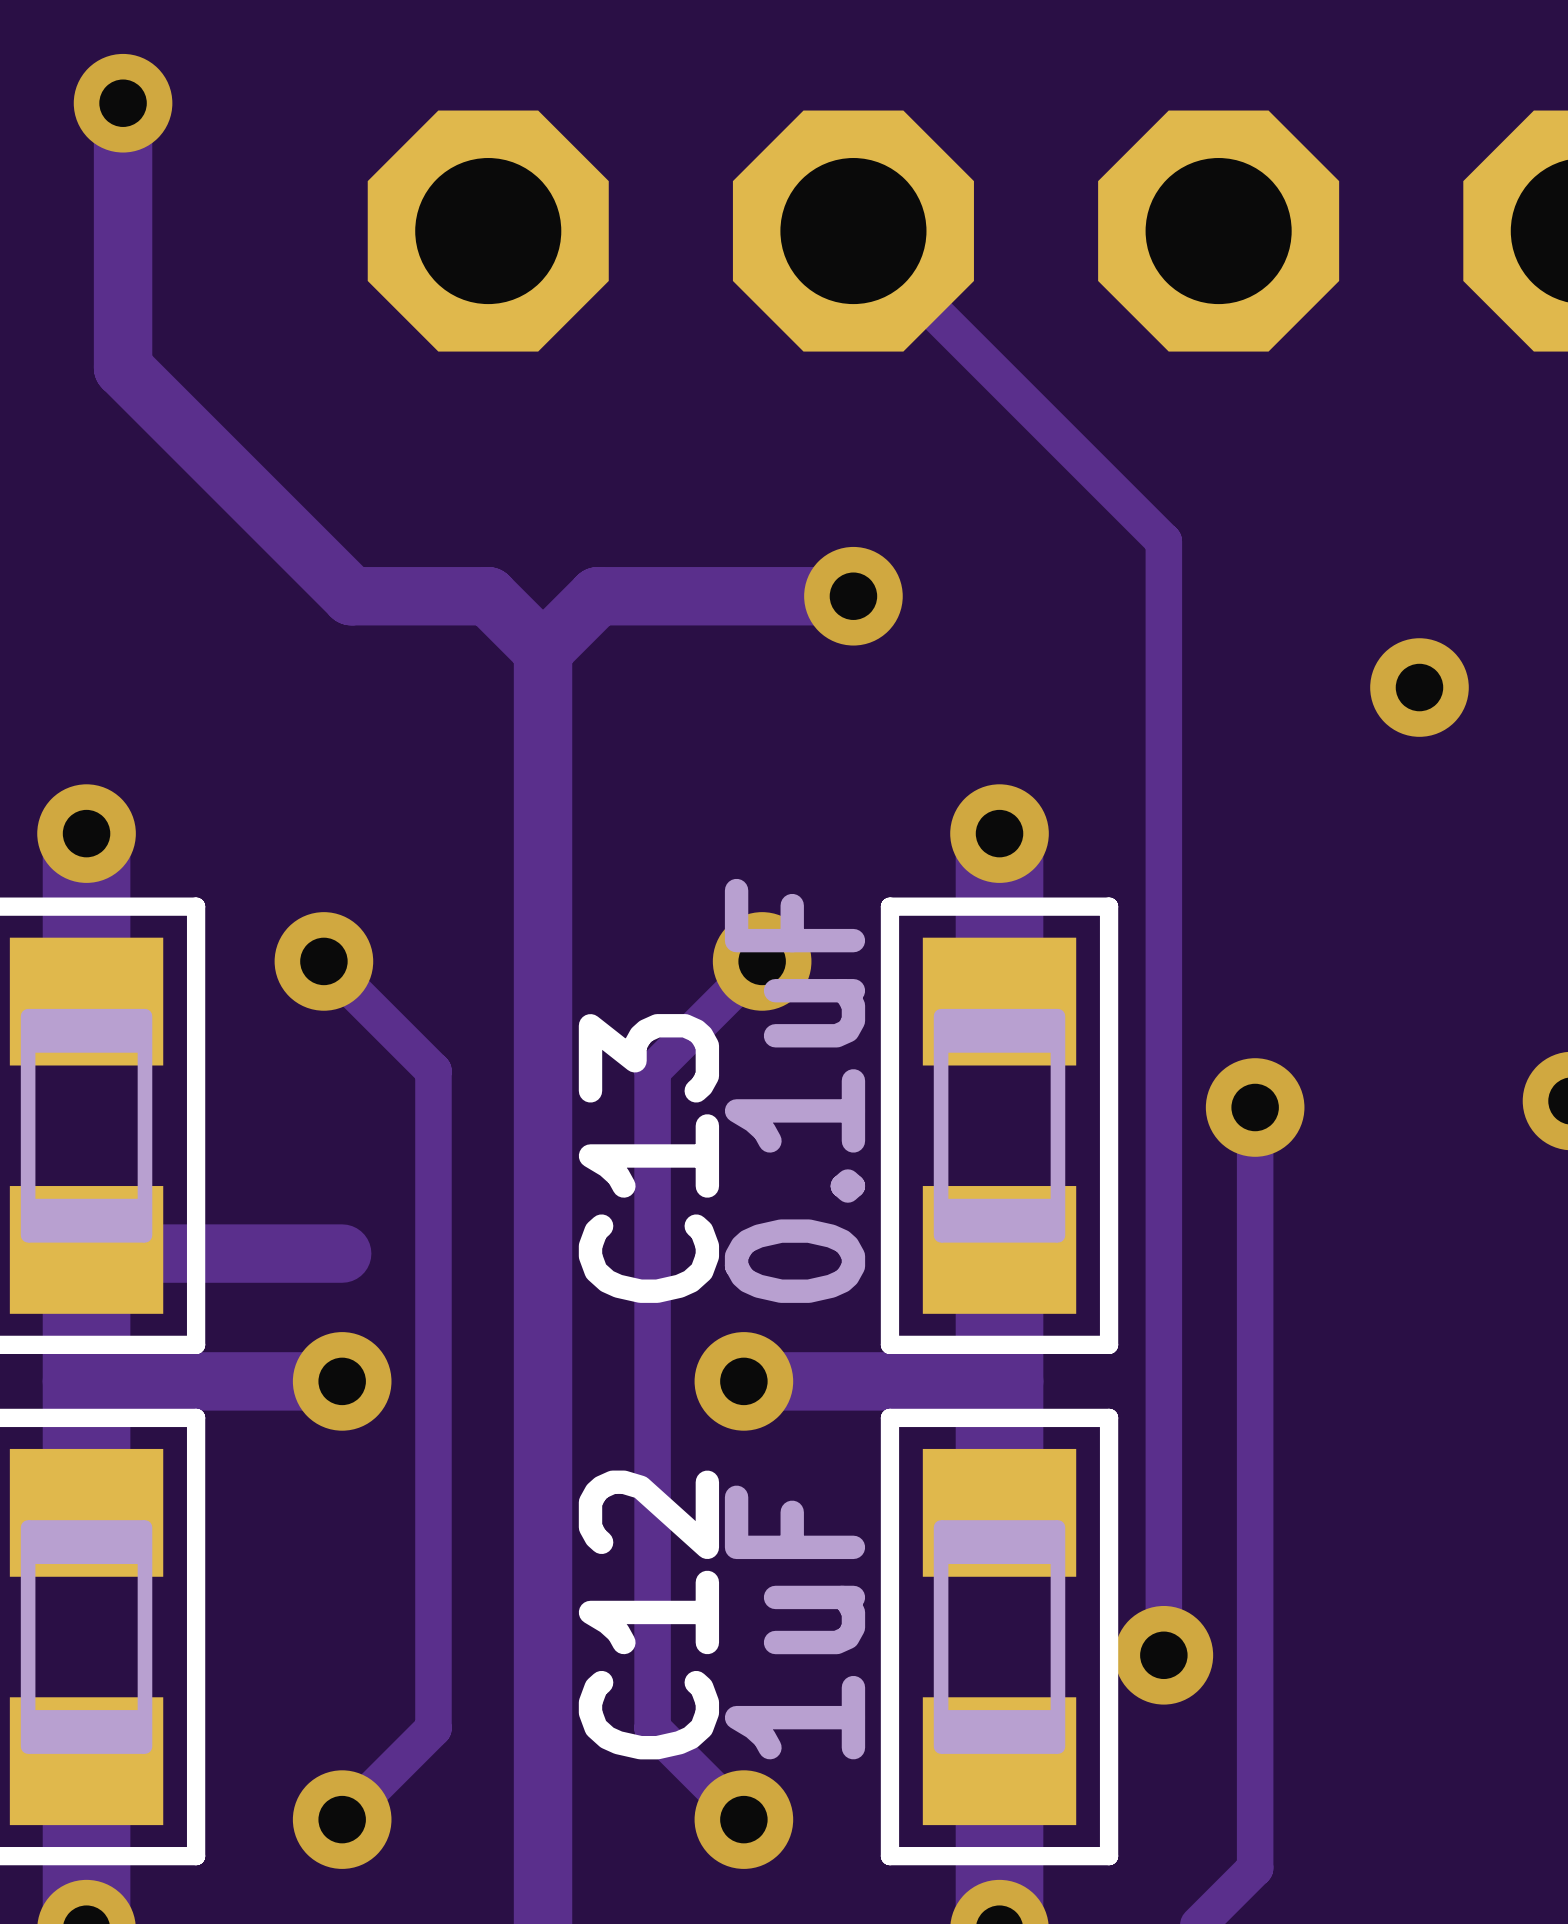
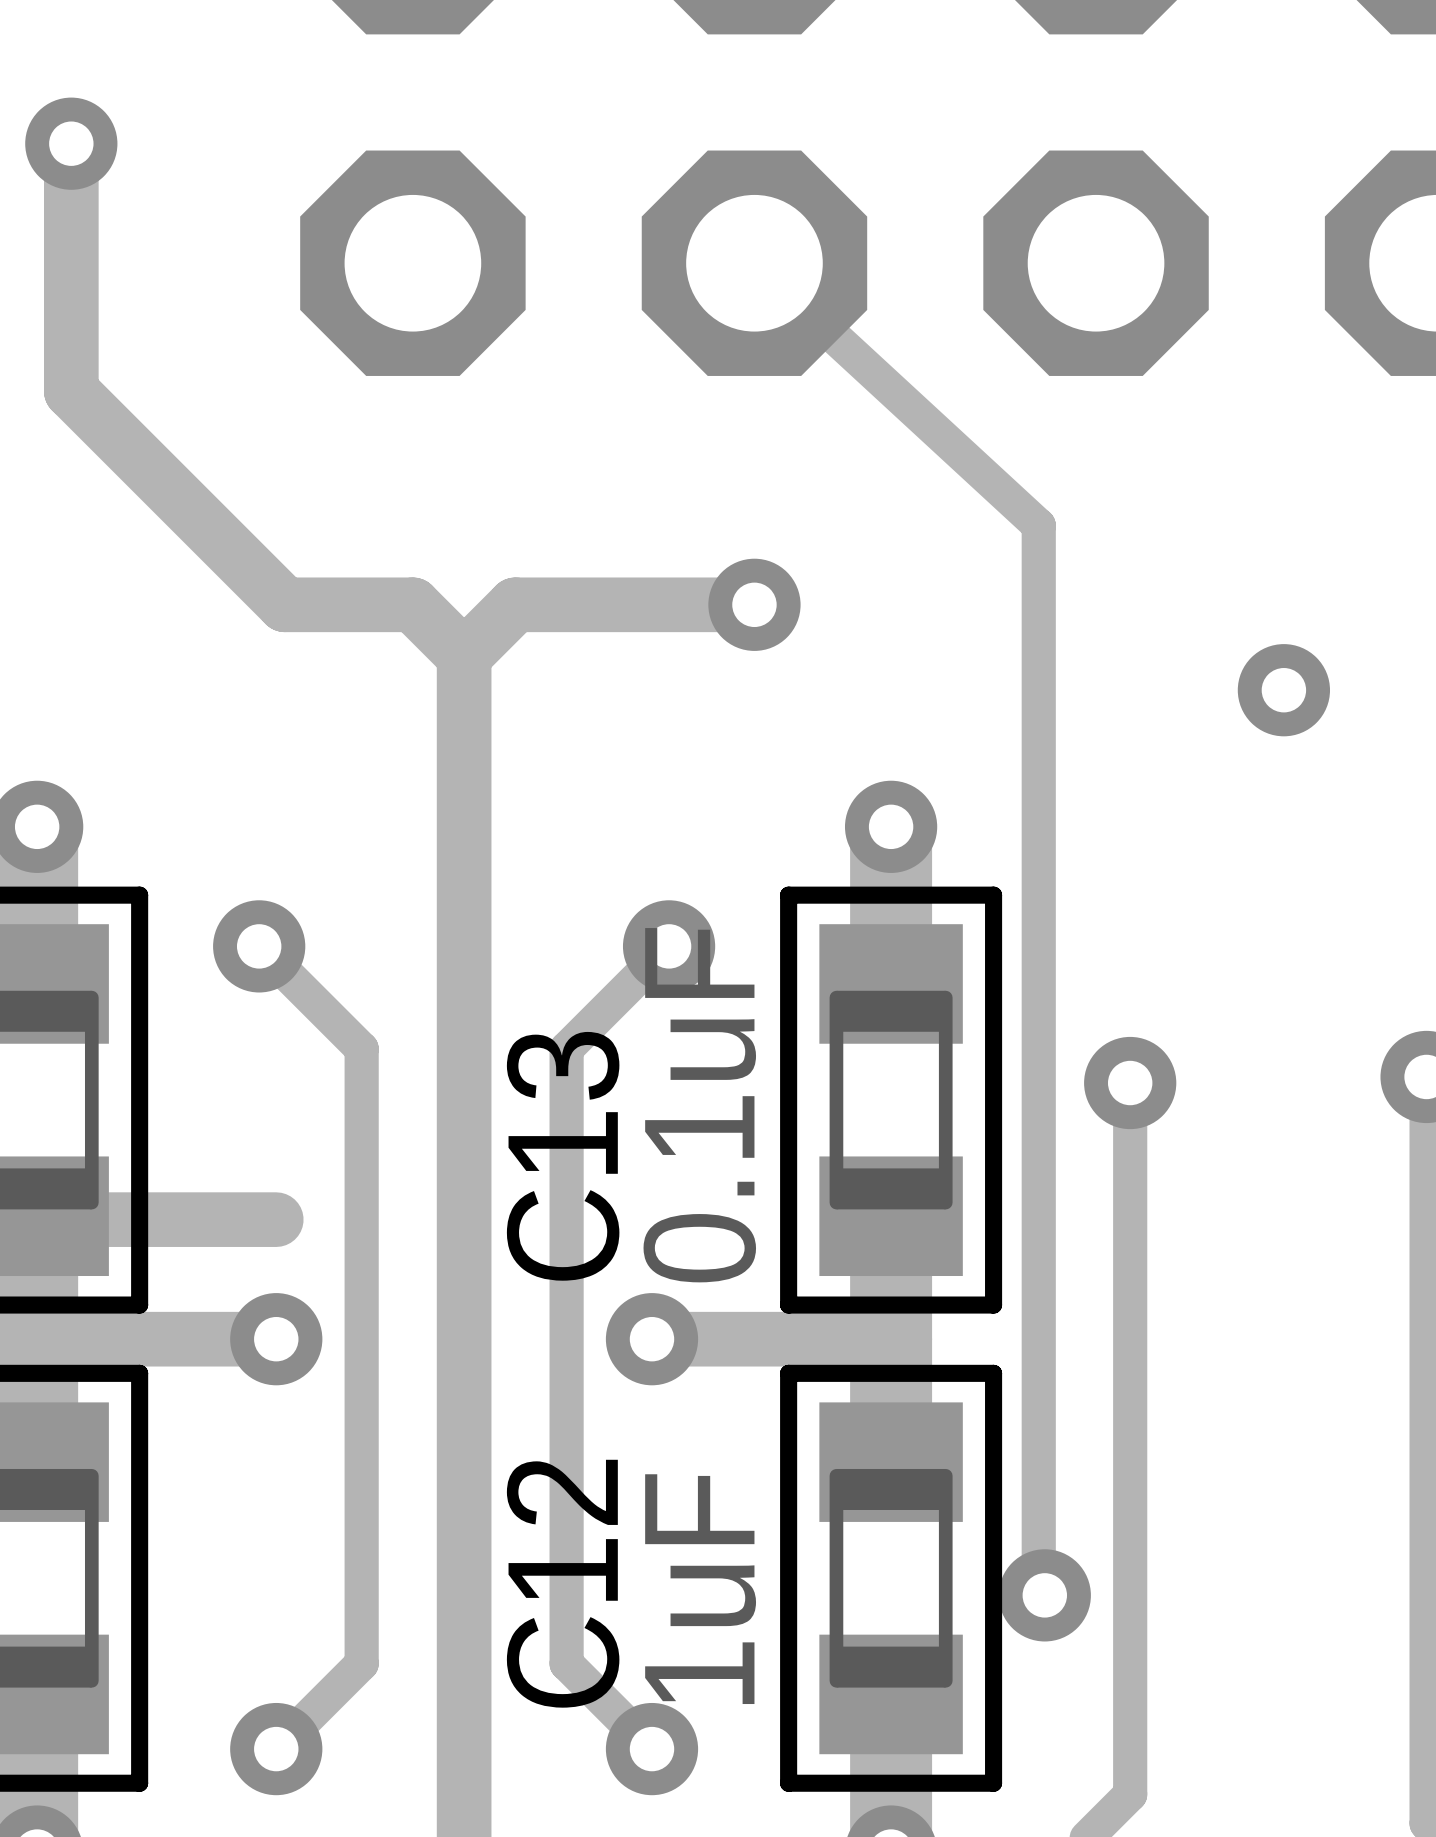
track: (853, 231) (1163, 541) (1163, 1655) -> (754, 263) (1038, 525) (1038, 1601)

